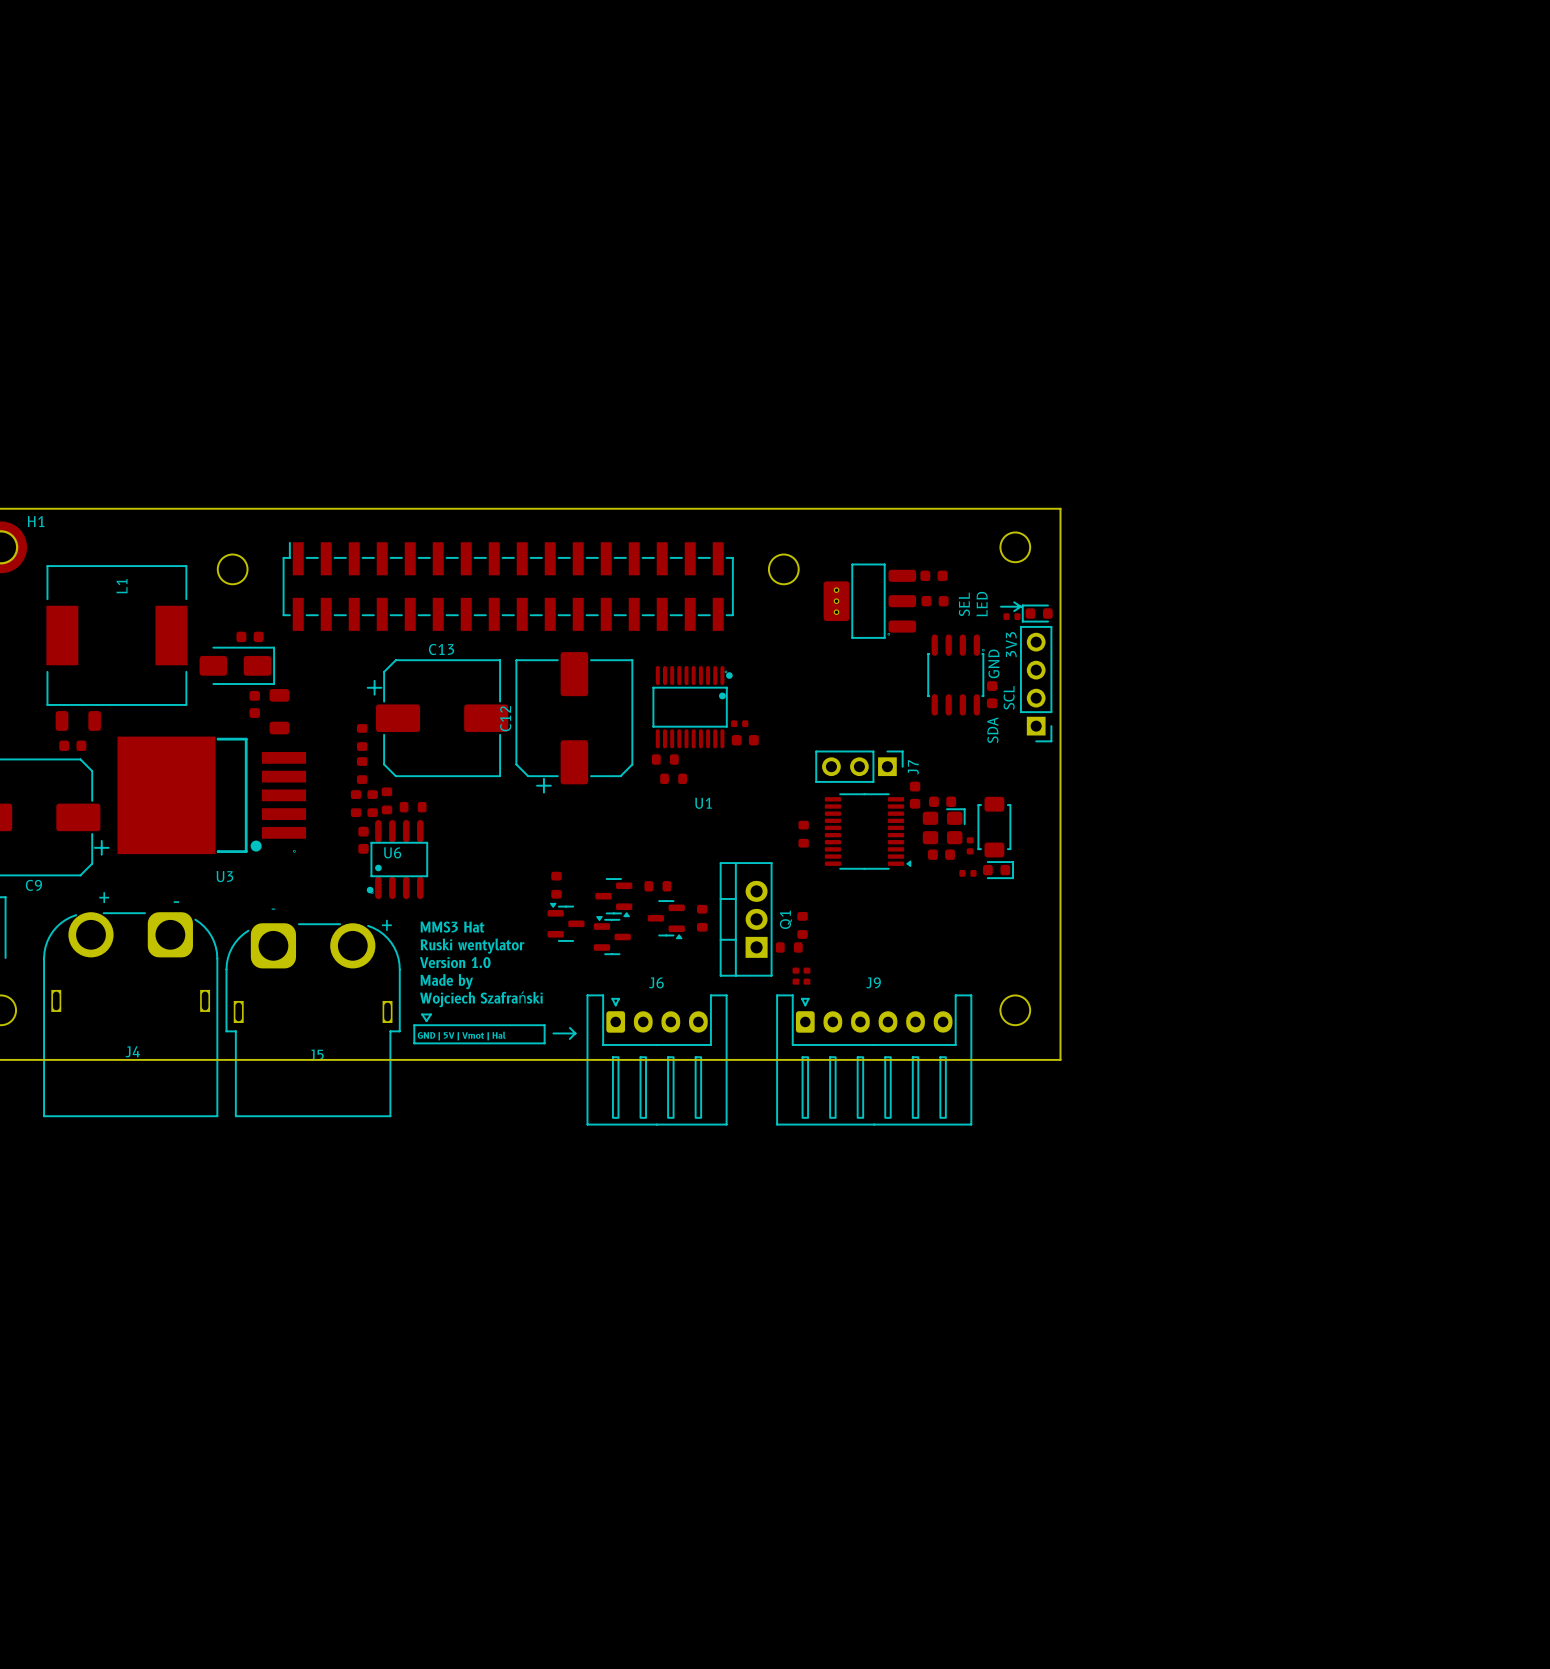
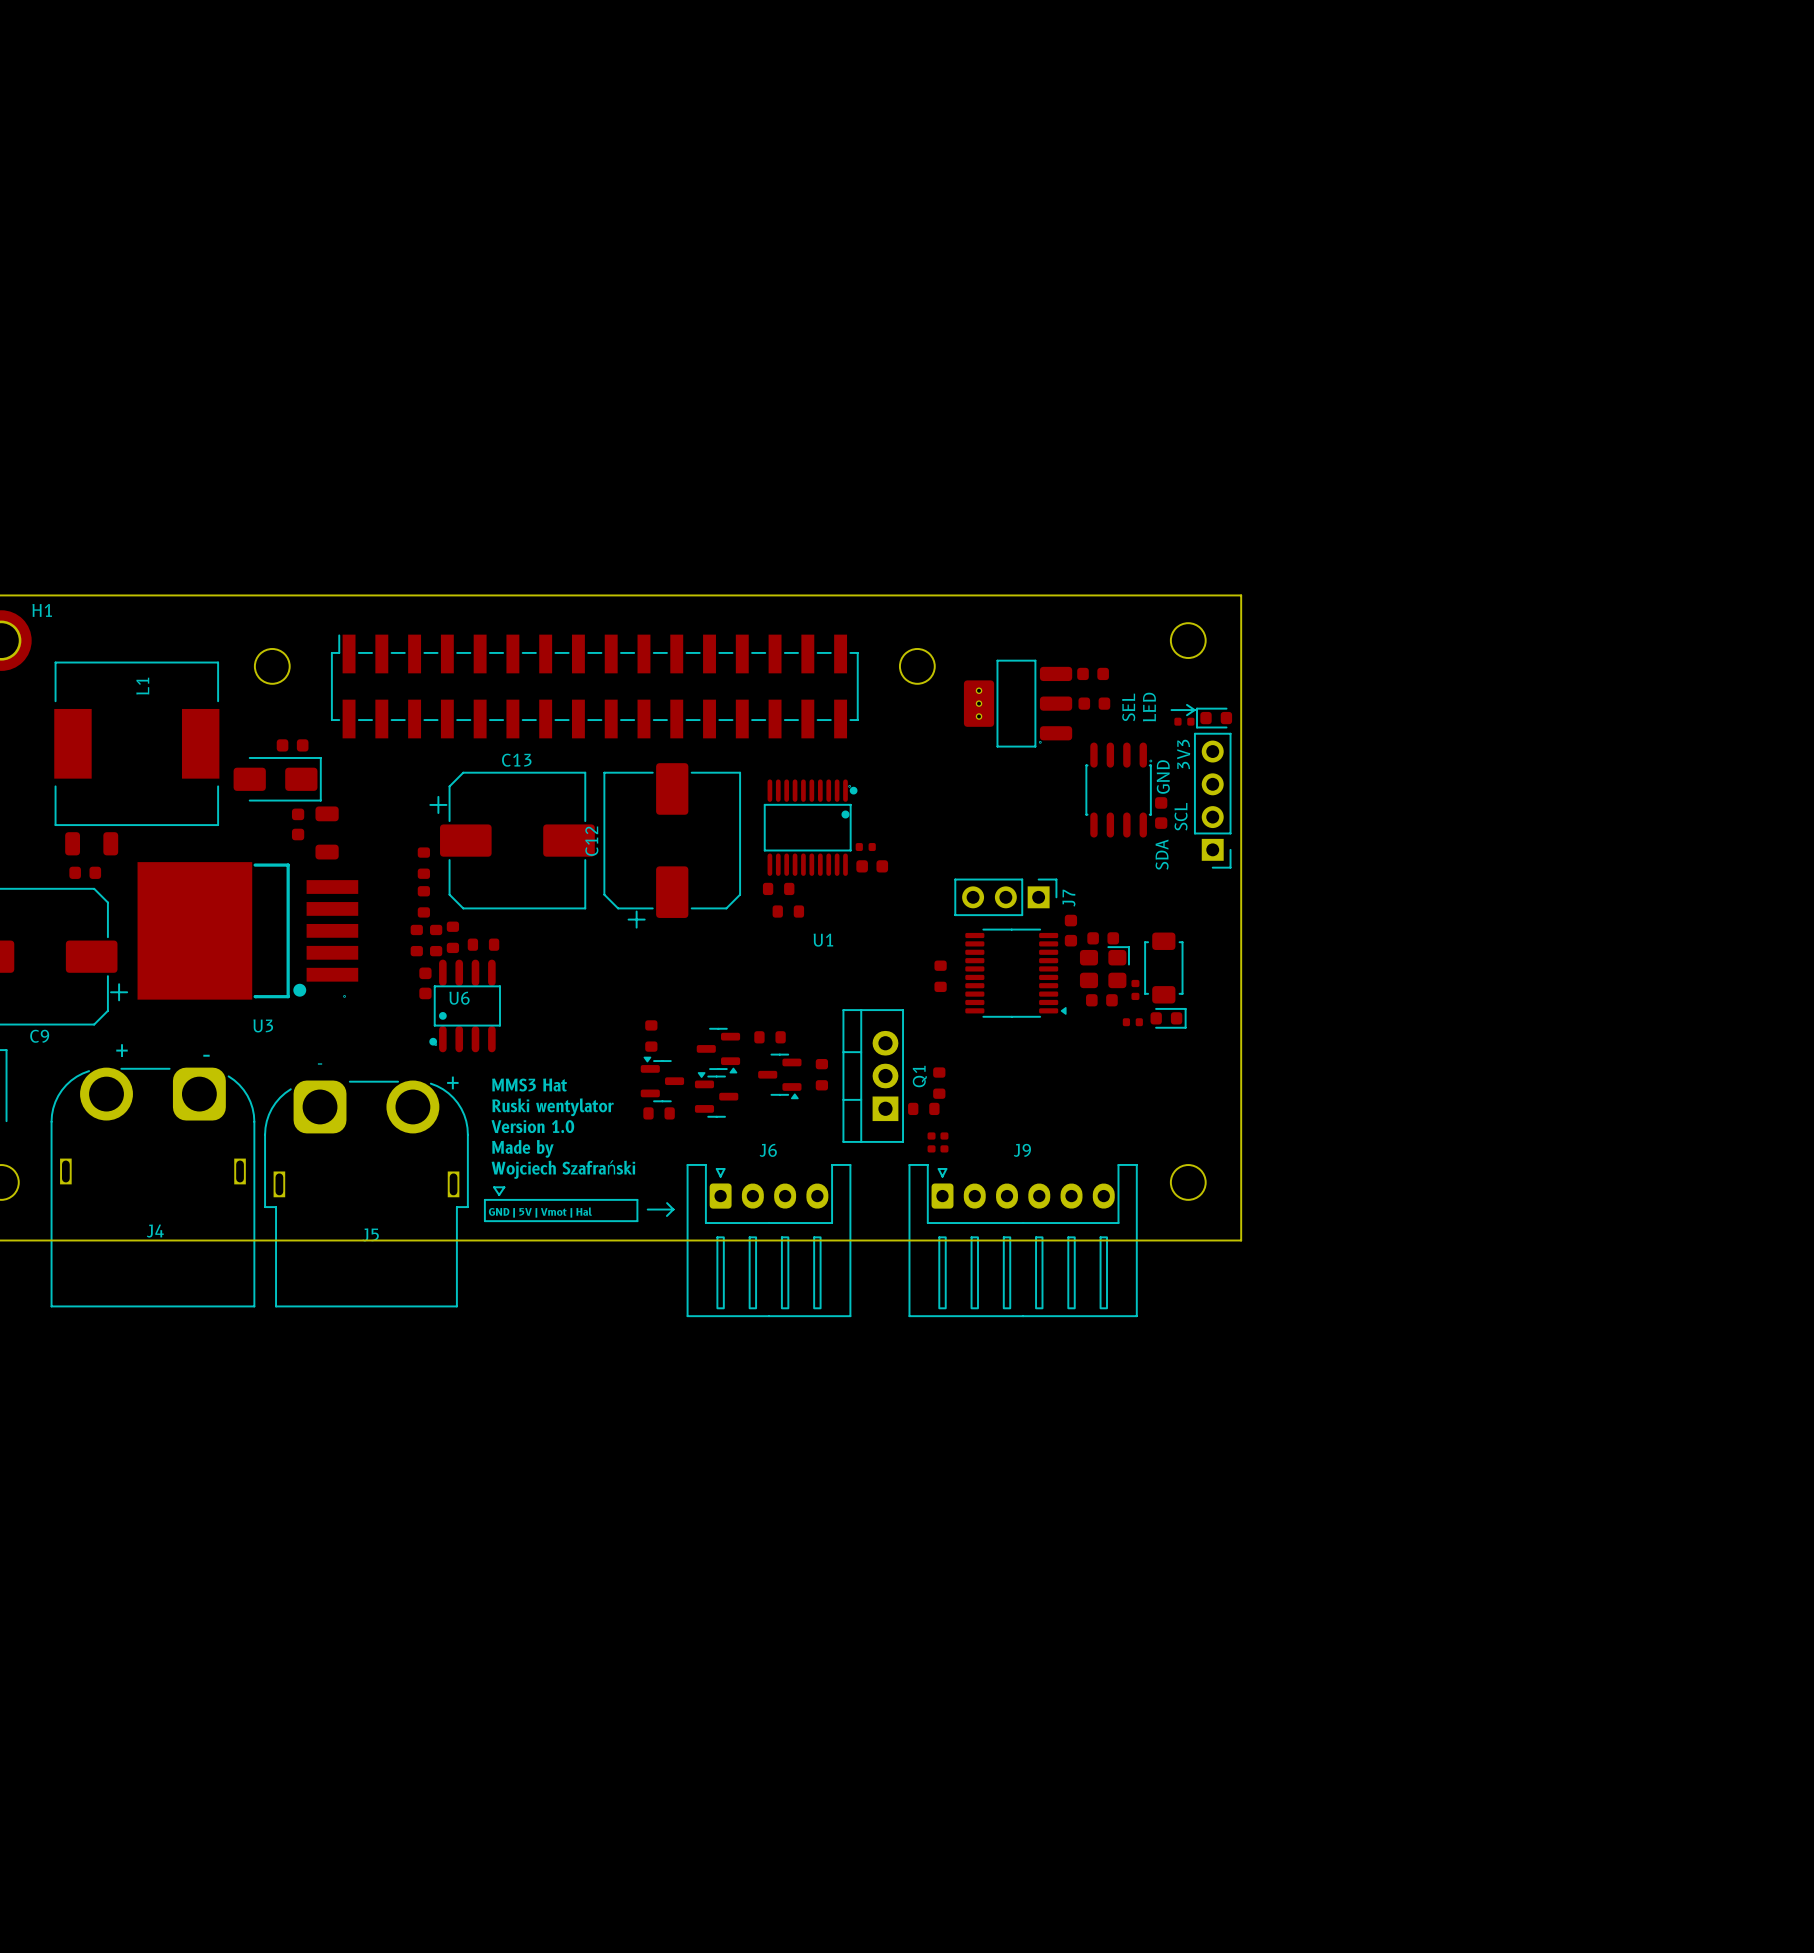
part: none -> (659, 1113)

